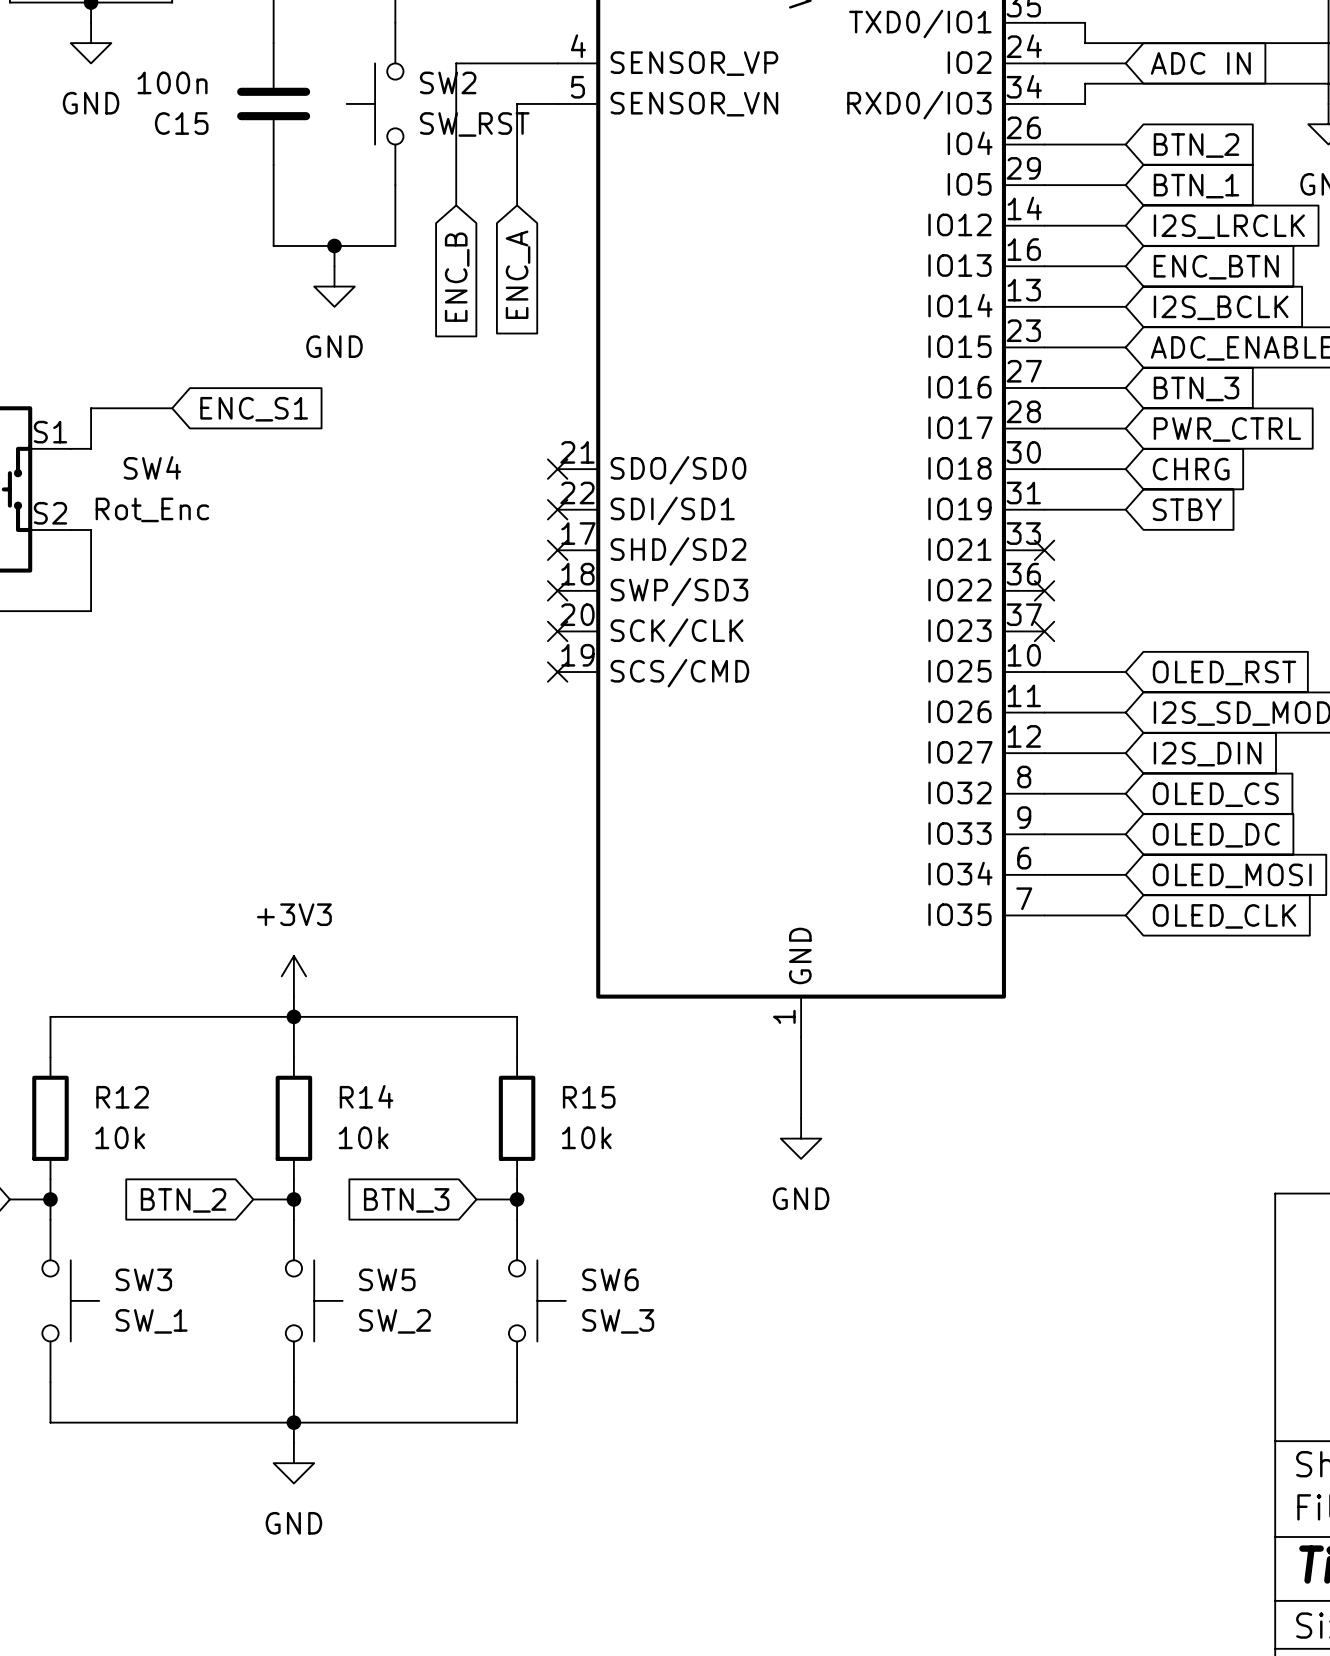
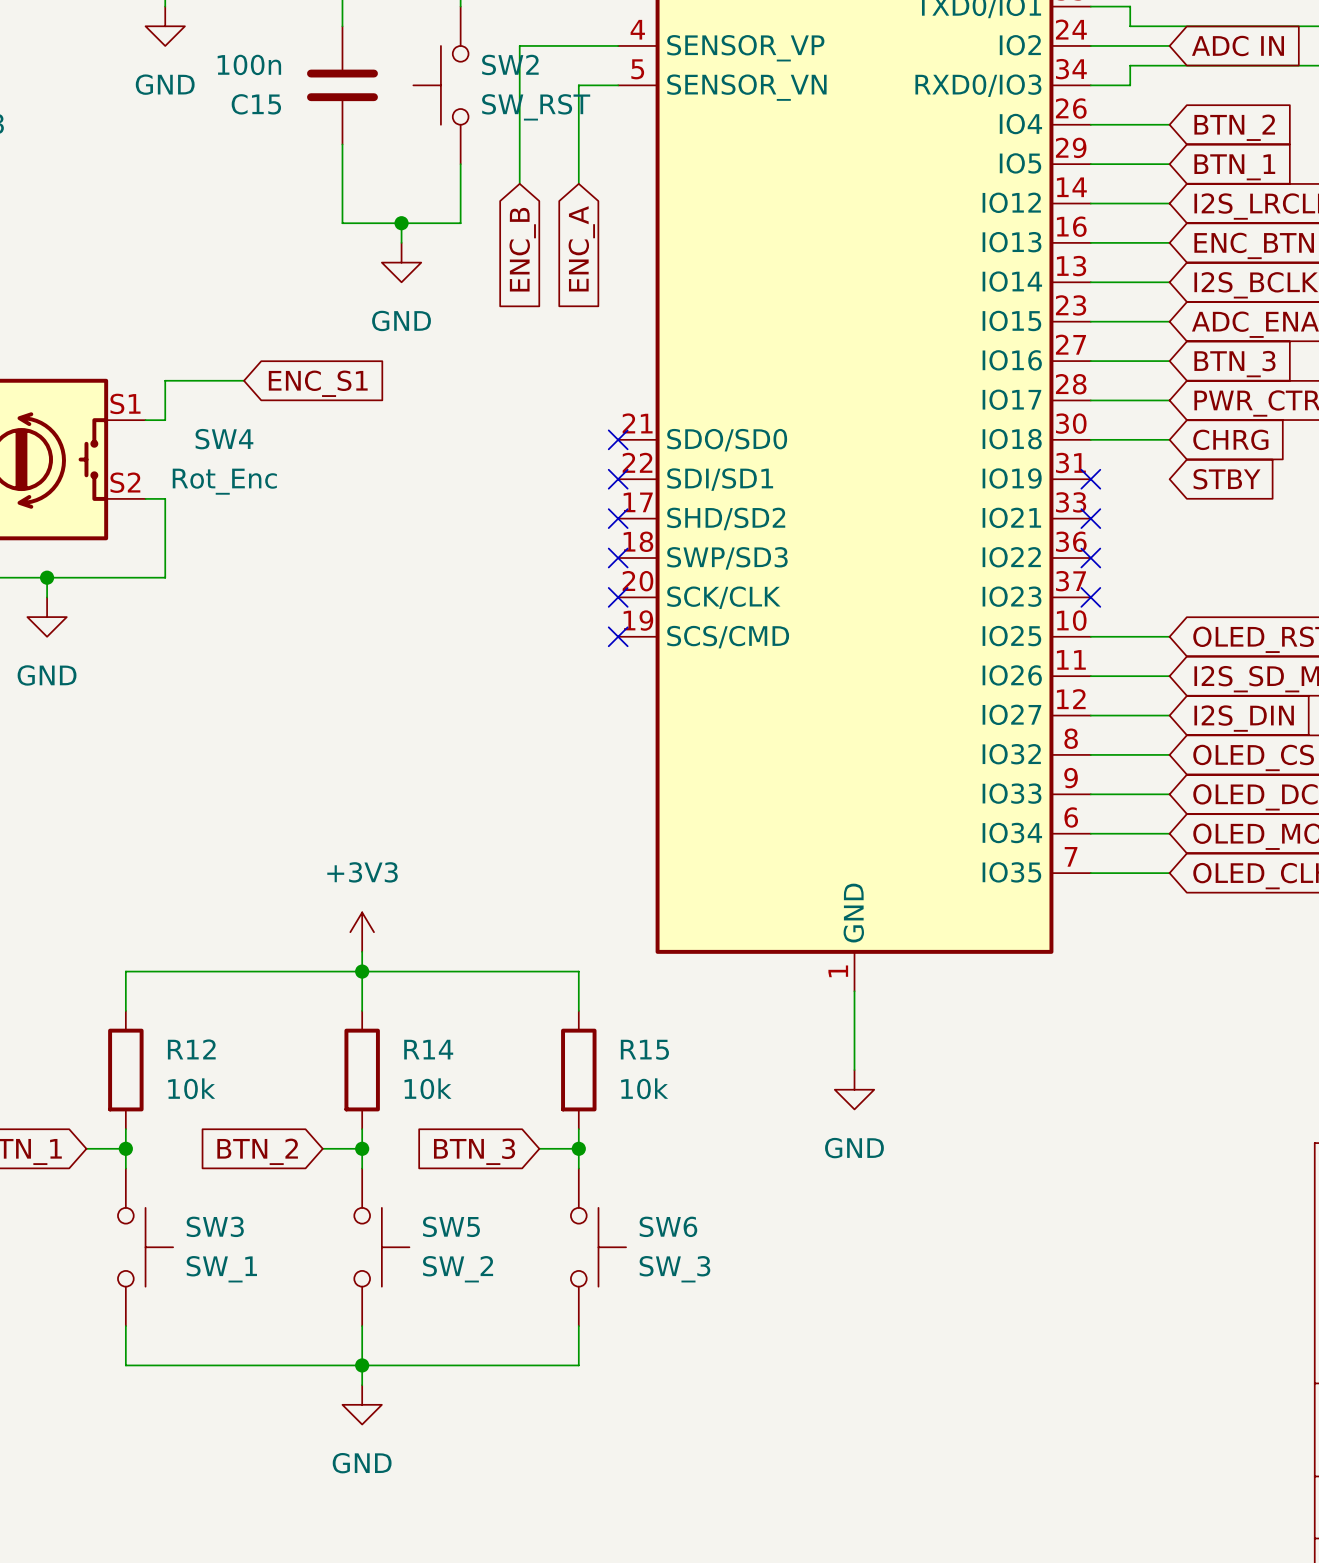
wire: (1044, 509) (1125, 509) -> none
no-connect mark: none -> (1090, 479)

